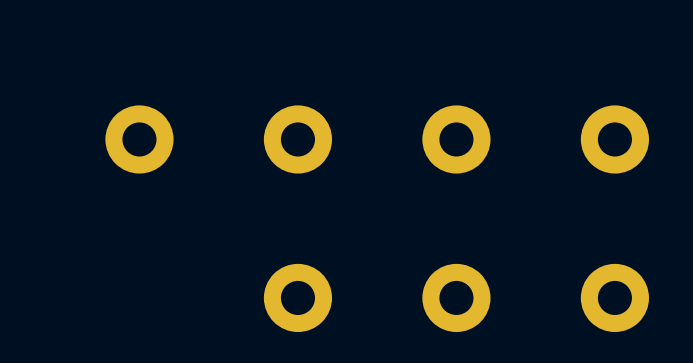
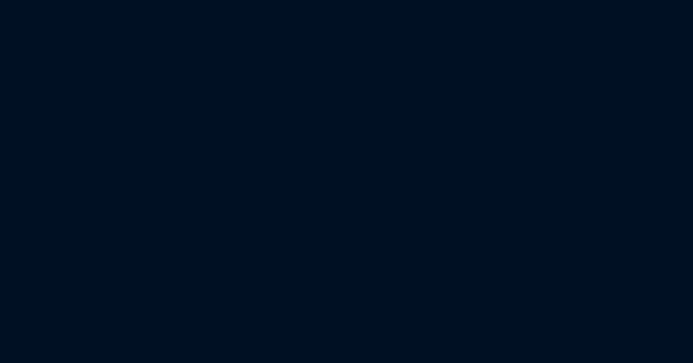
part: (139, 139) -> none
part: (297, 139) -> none
part: (456, 139) -> none
part: (614, 139) -> none
part: (297, 297) -> none
part: (456, 297) -> none
part: (614, 297) -> none

